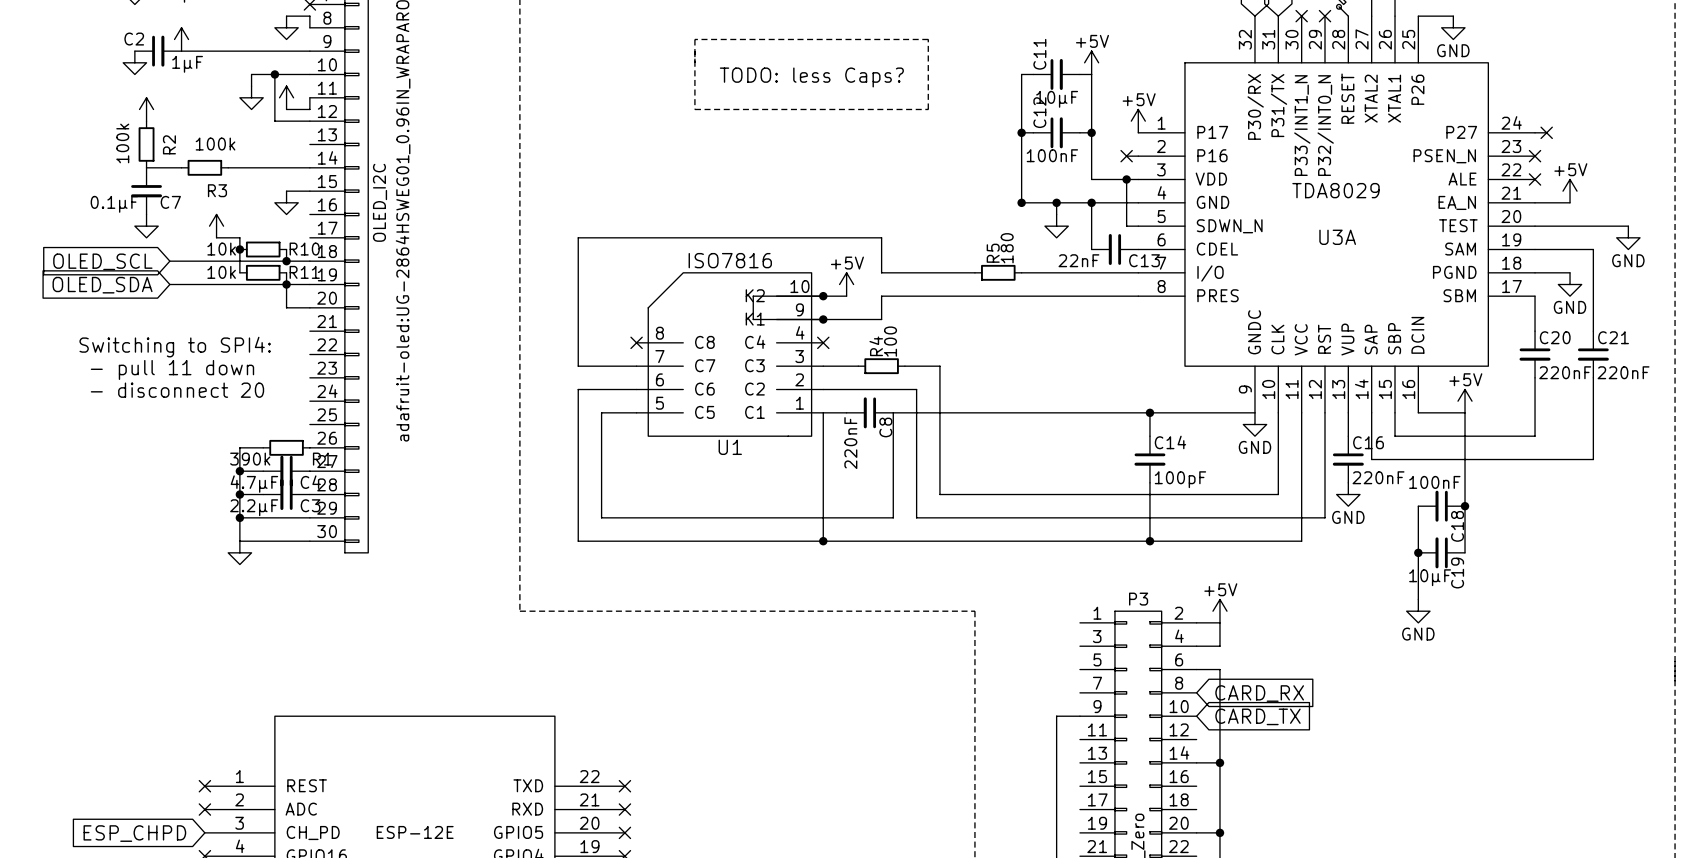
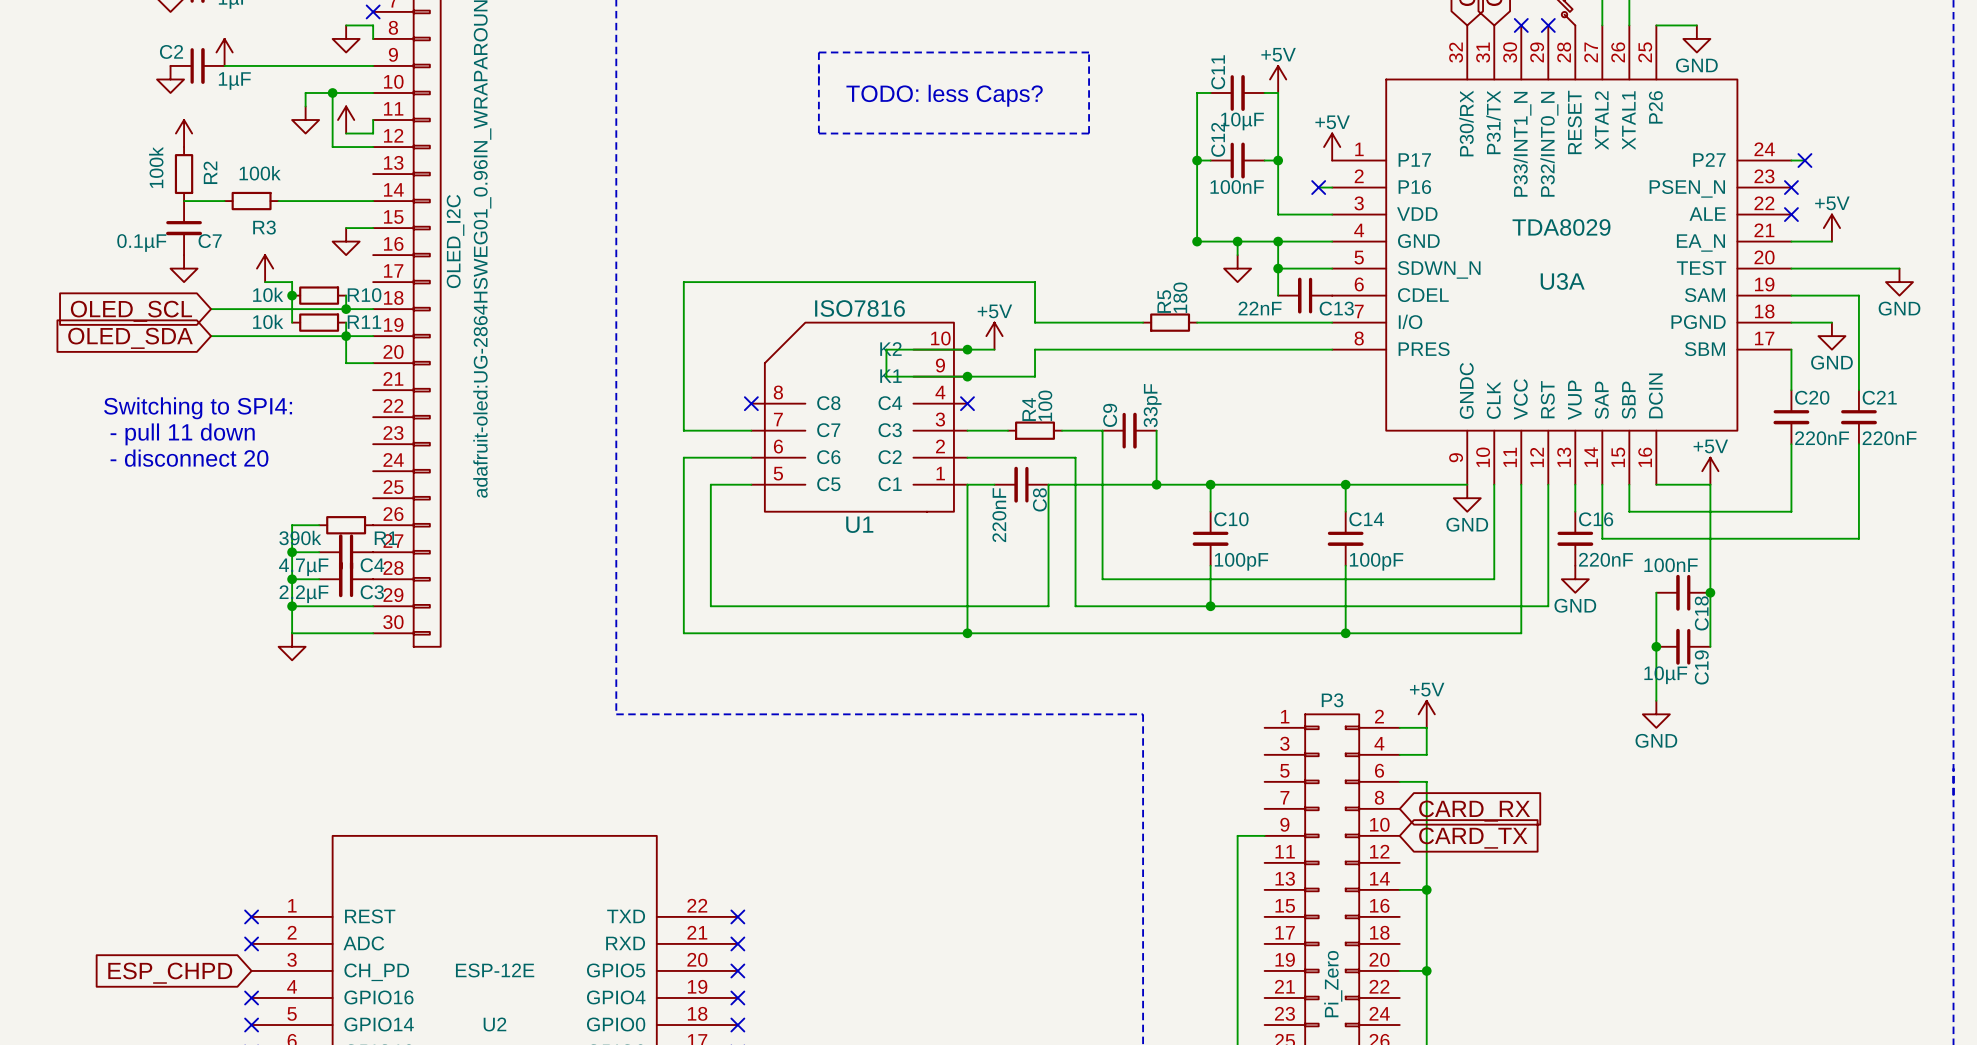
wire: (1126, 179) (1126, 226) -> (1278, 268) (1318, 268)
junction: (1126, 179) -> none
junction: none -> (1278, 268)
C9: none -> 33pF (1129, 430)
wire: none -> (1156, 430) (1156, 484)
junction: none -> (1156, 484)
wire: none -> (1210, 484) (1210, 511)
junction: none -> (1210, 484)
C10: none -> 100pF (1210, 538)
wire: none -> (1210, 565) (1210, 606)
junction: none -> (1210, 606)

